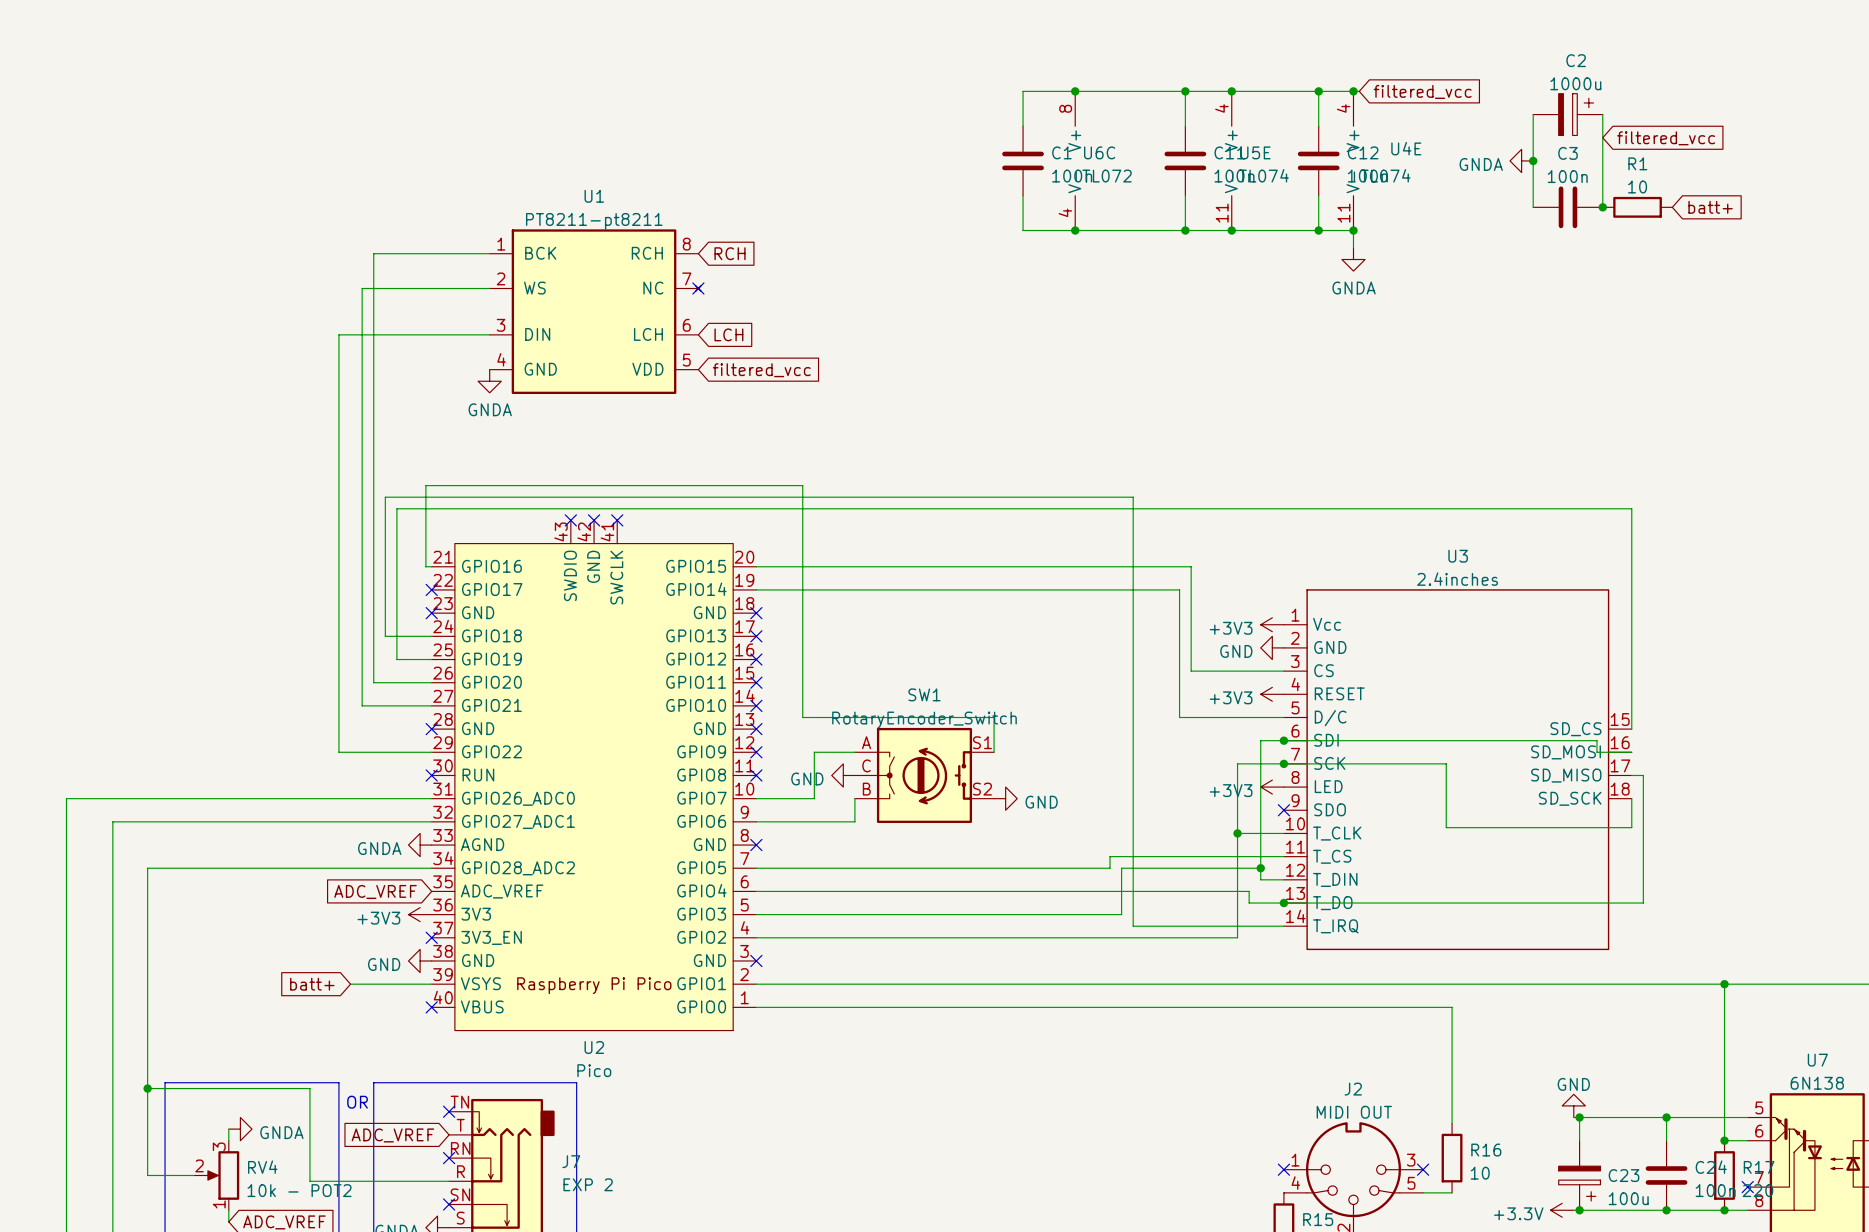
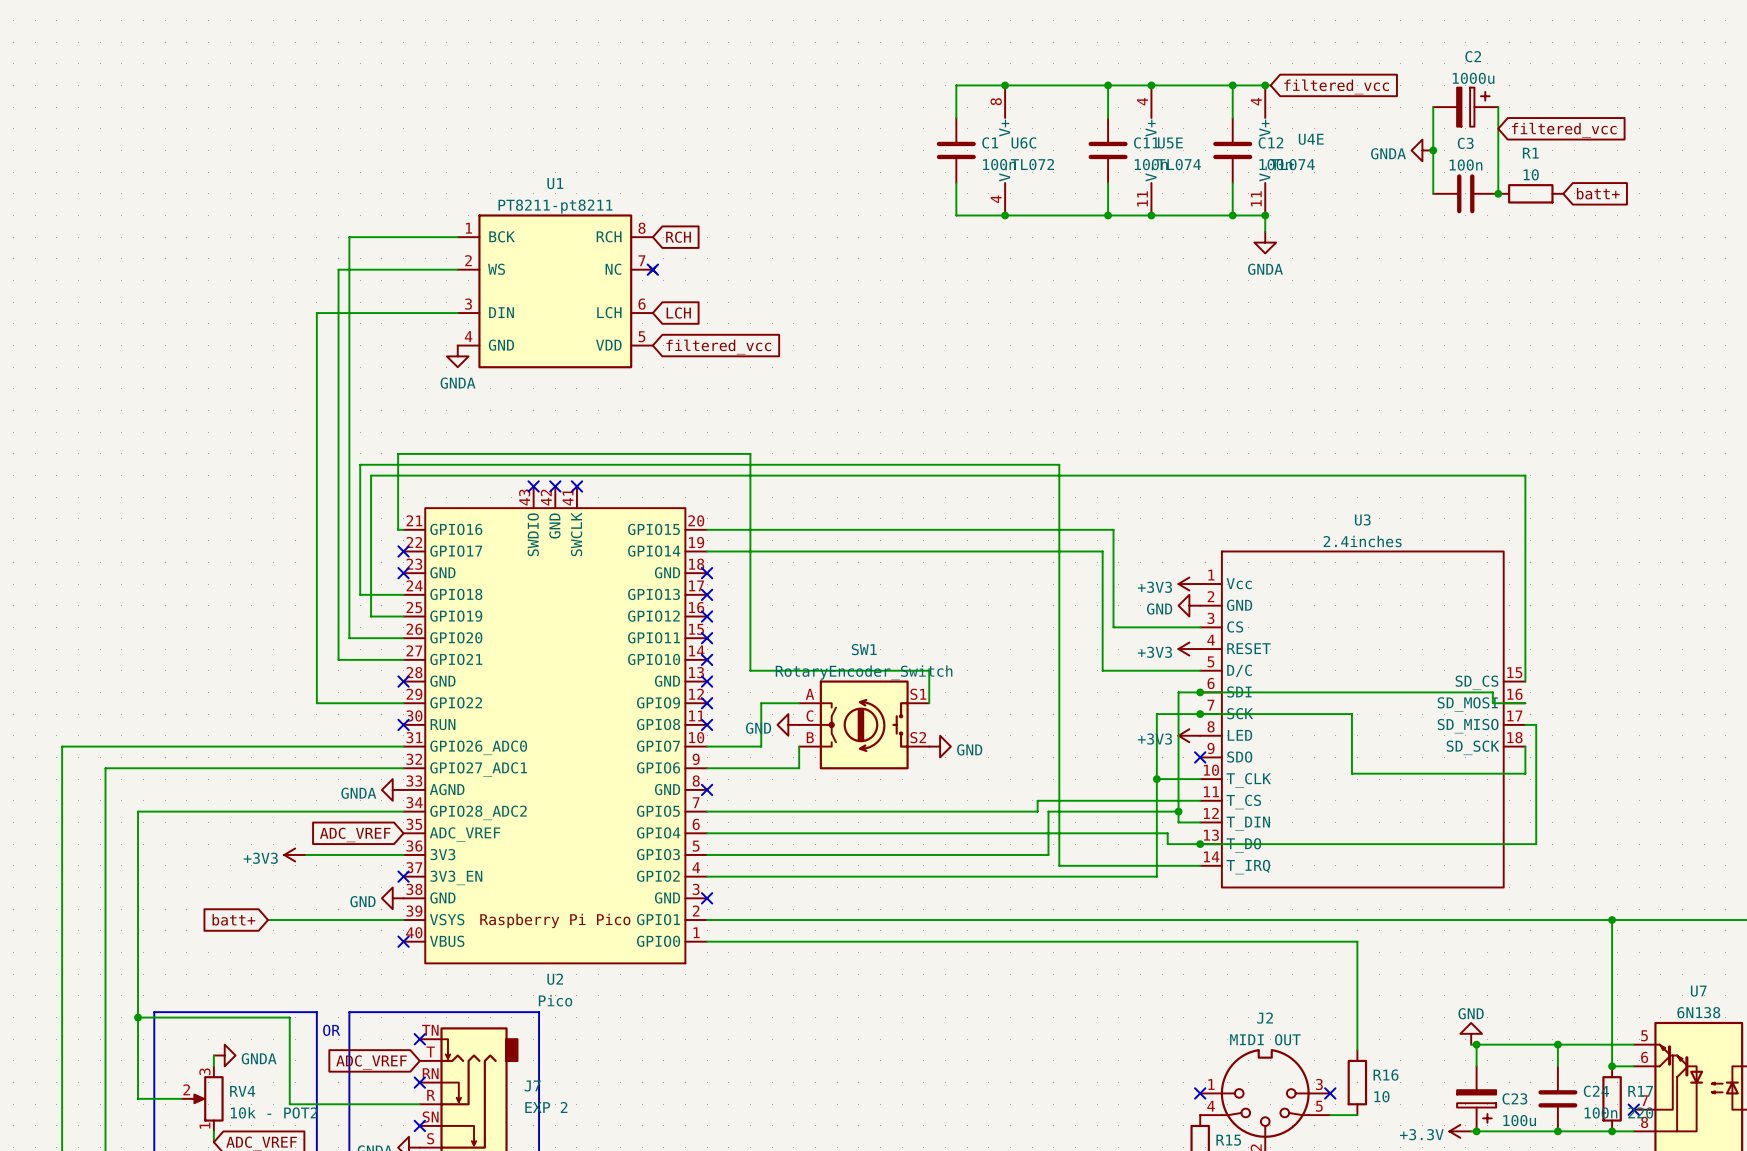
wire: none -> (306, 854) (403, 854)
power symbol position: +3V3 (420, 914) -> +3V3 (295, 854)
wire: none -> (268, 920) (327, 920)
global label position: batt+ (312, 984) -> batt+ (233, 919)

